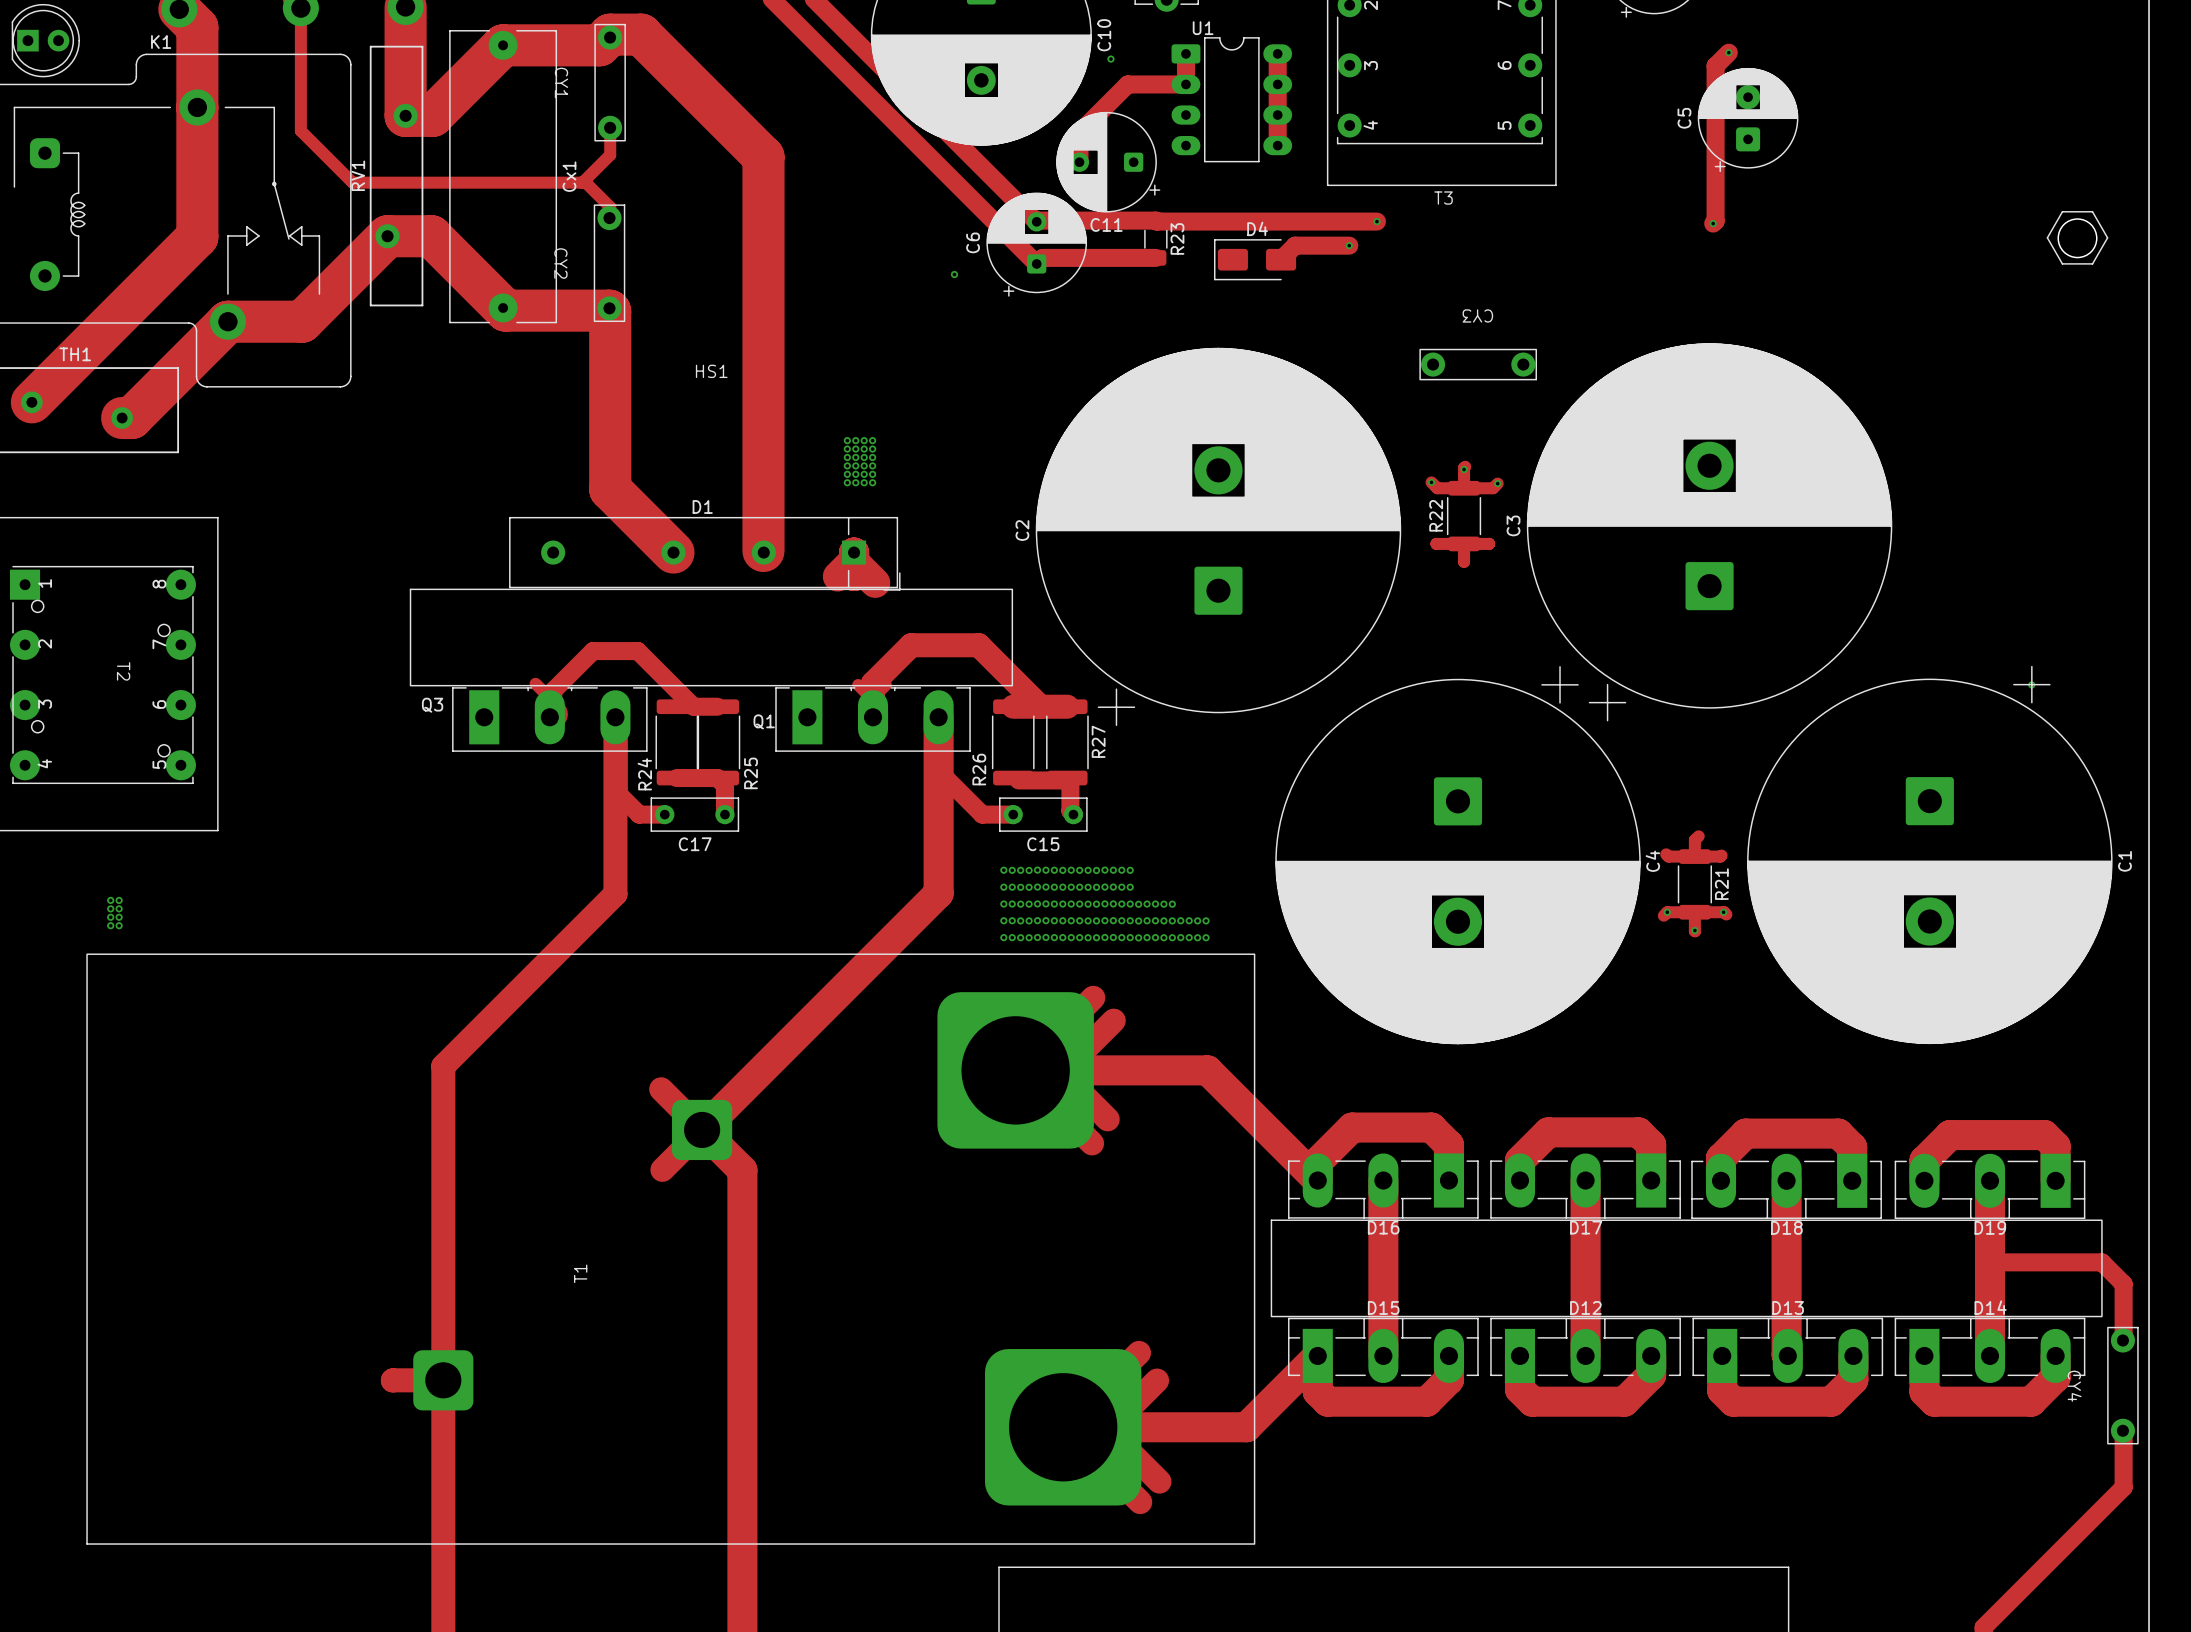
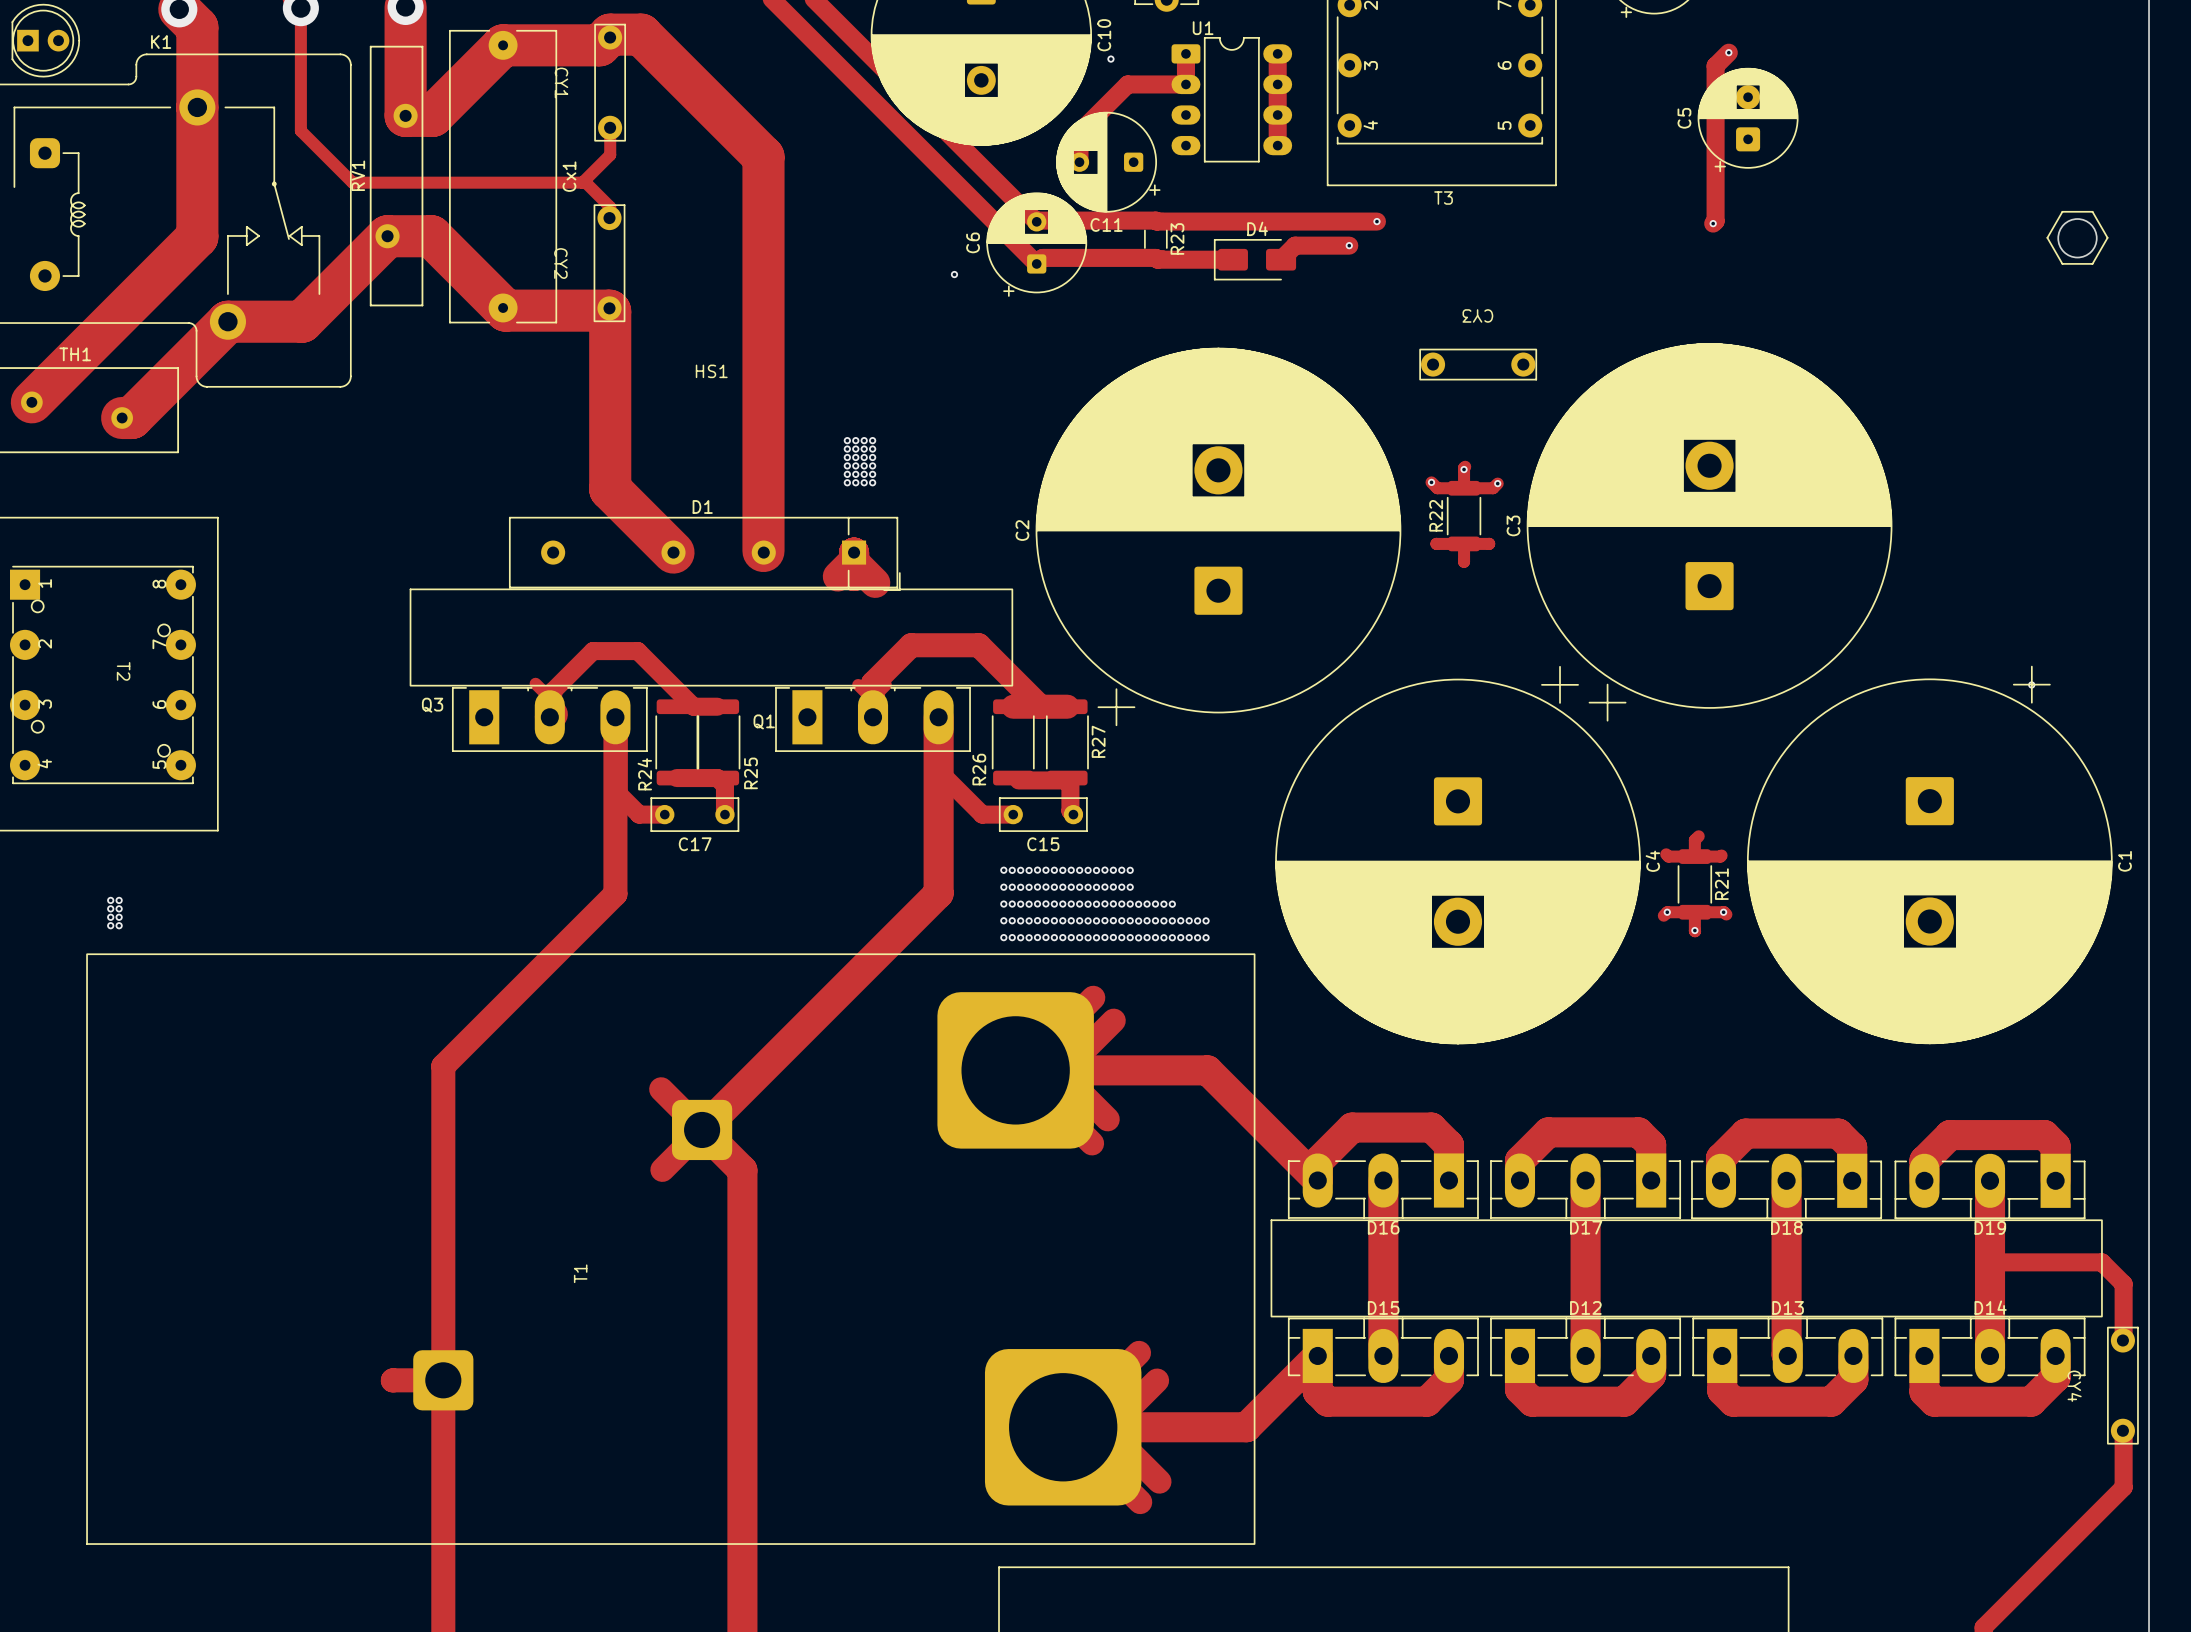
track: none -> (1155, 257) (1157, 259) (1232, 259)

